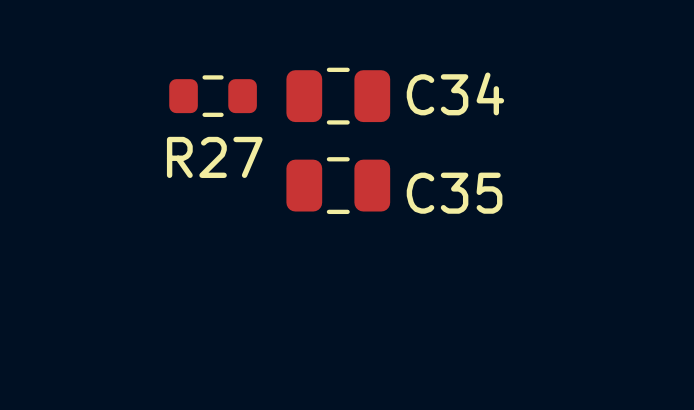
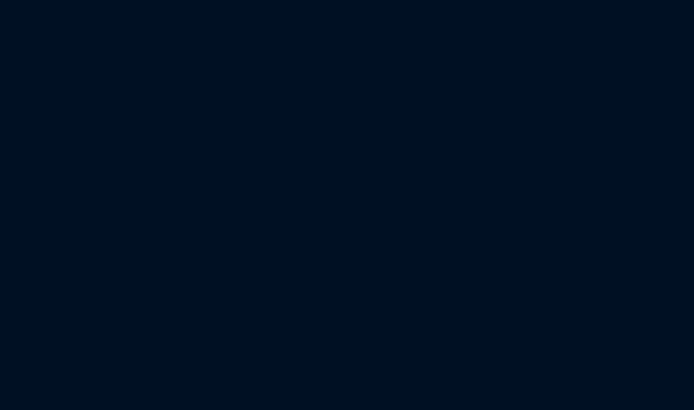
R27: (213, 96) -> none
C34: (338, 96) -> none
C35: (338, 185) -> none

